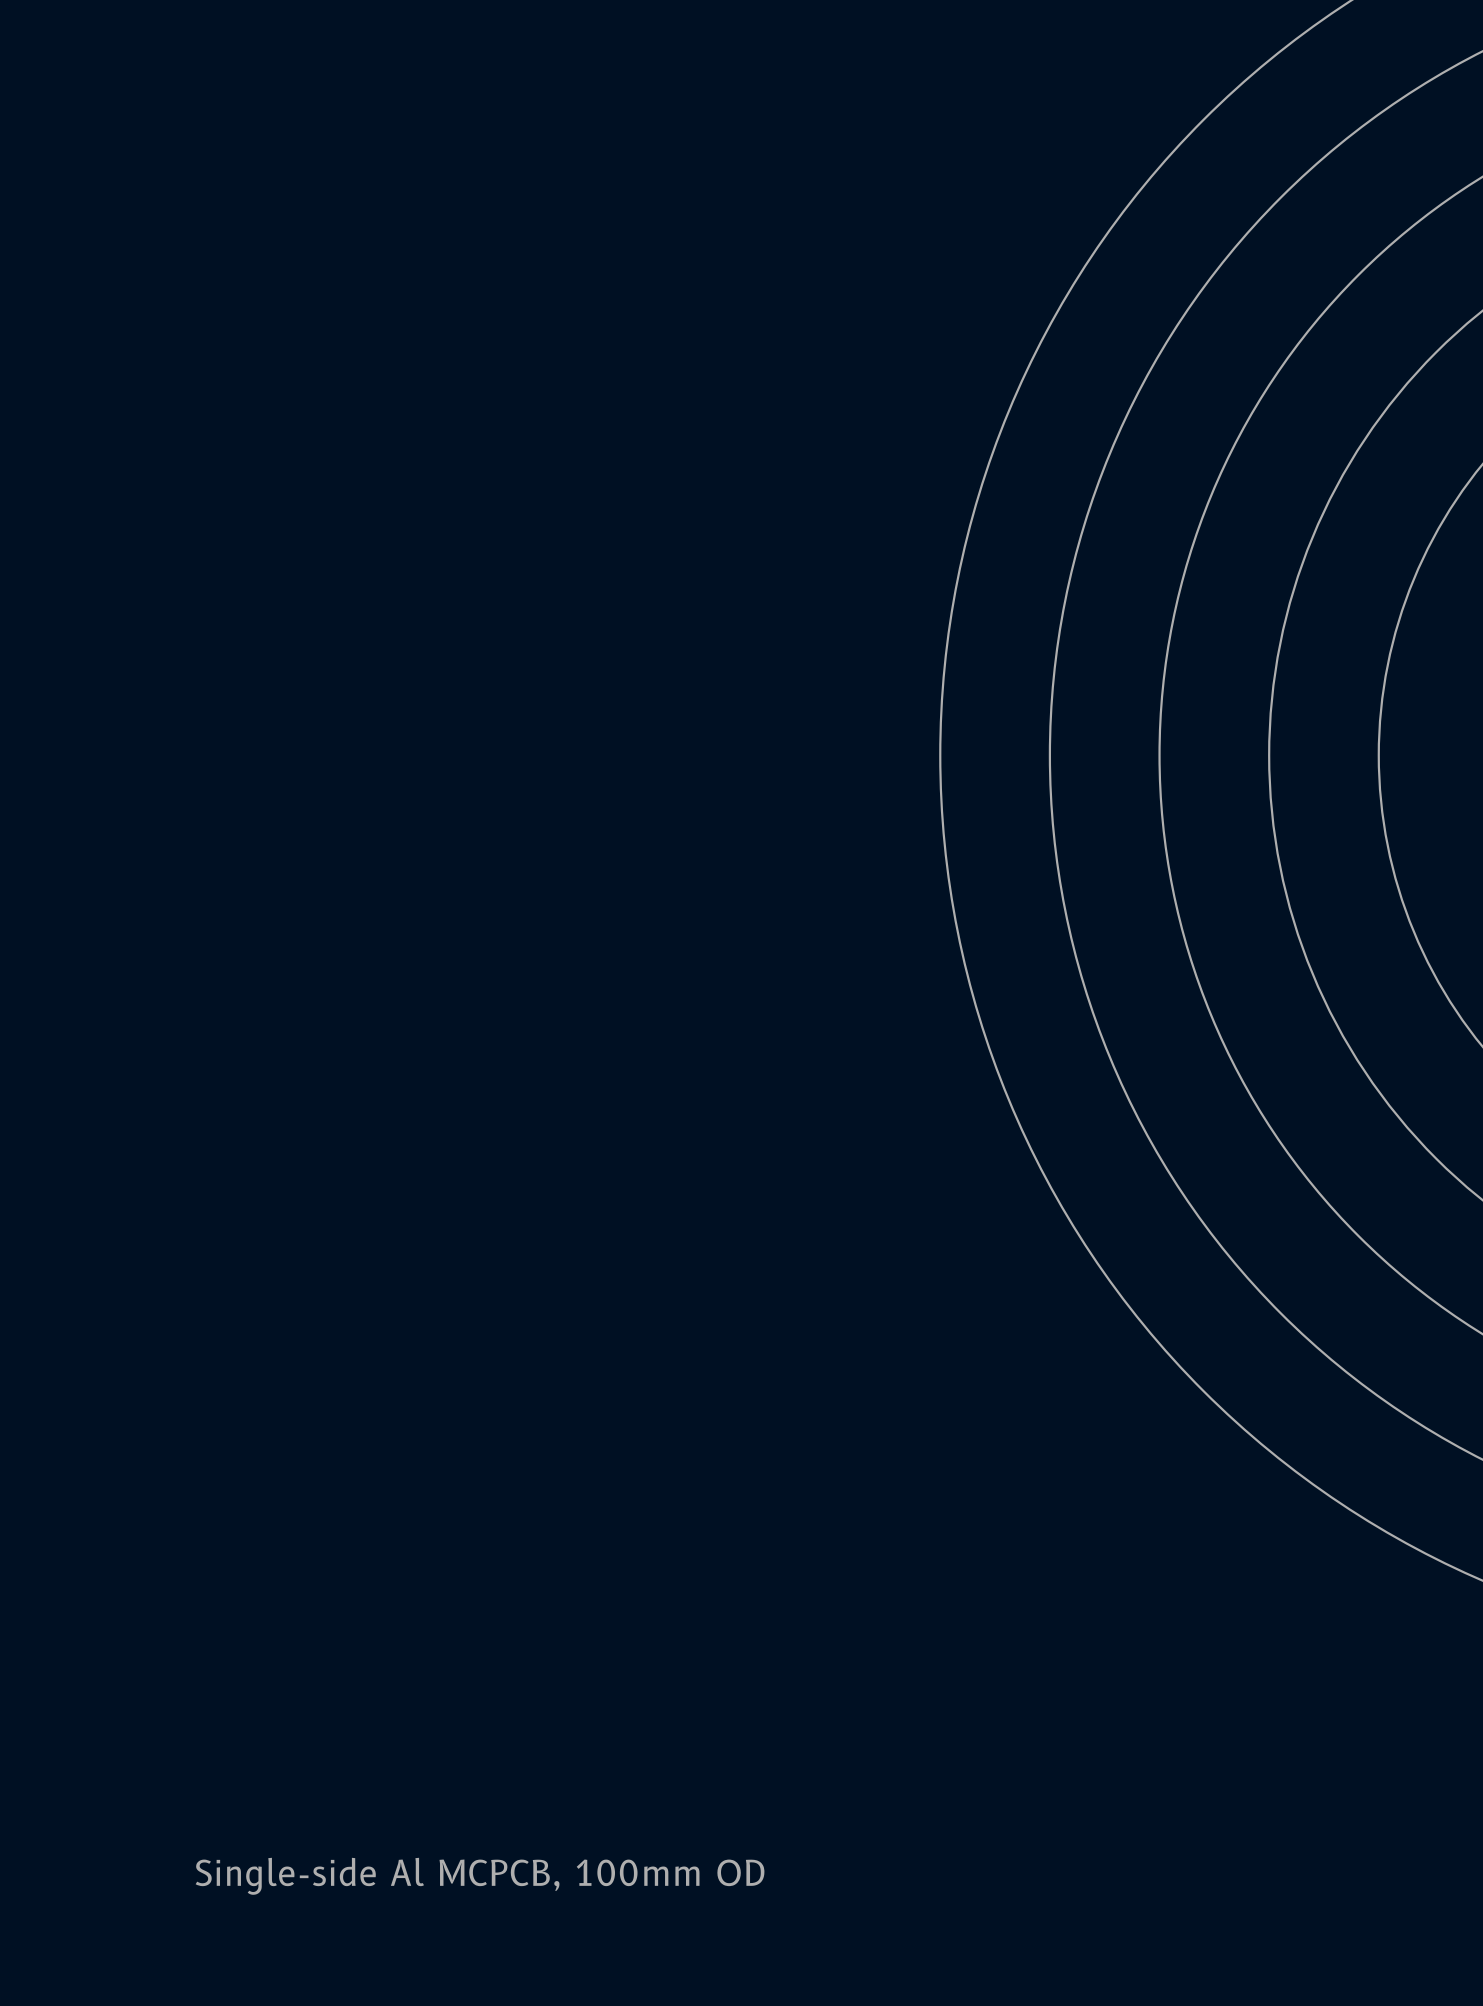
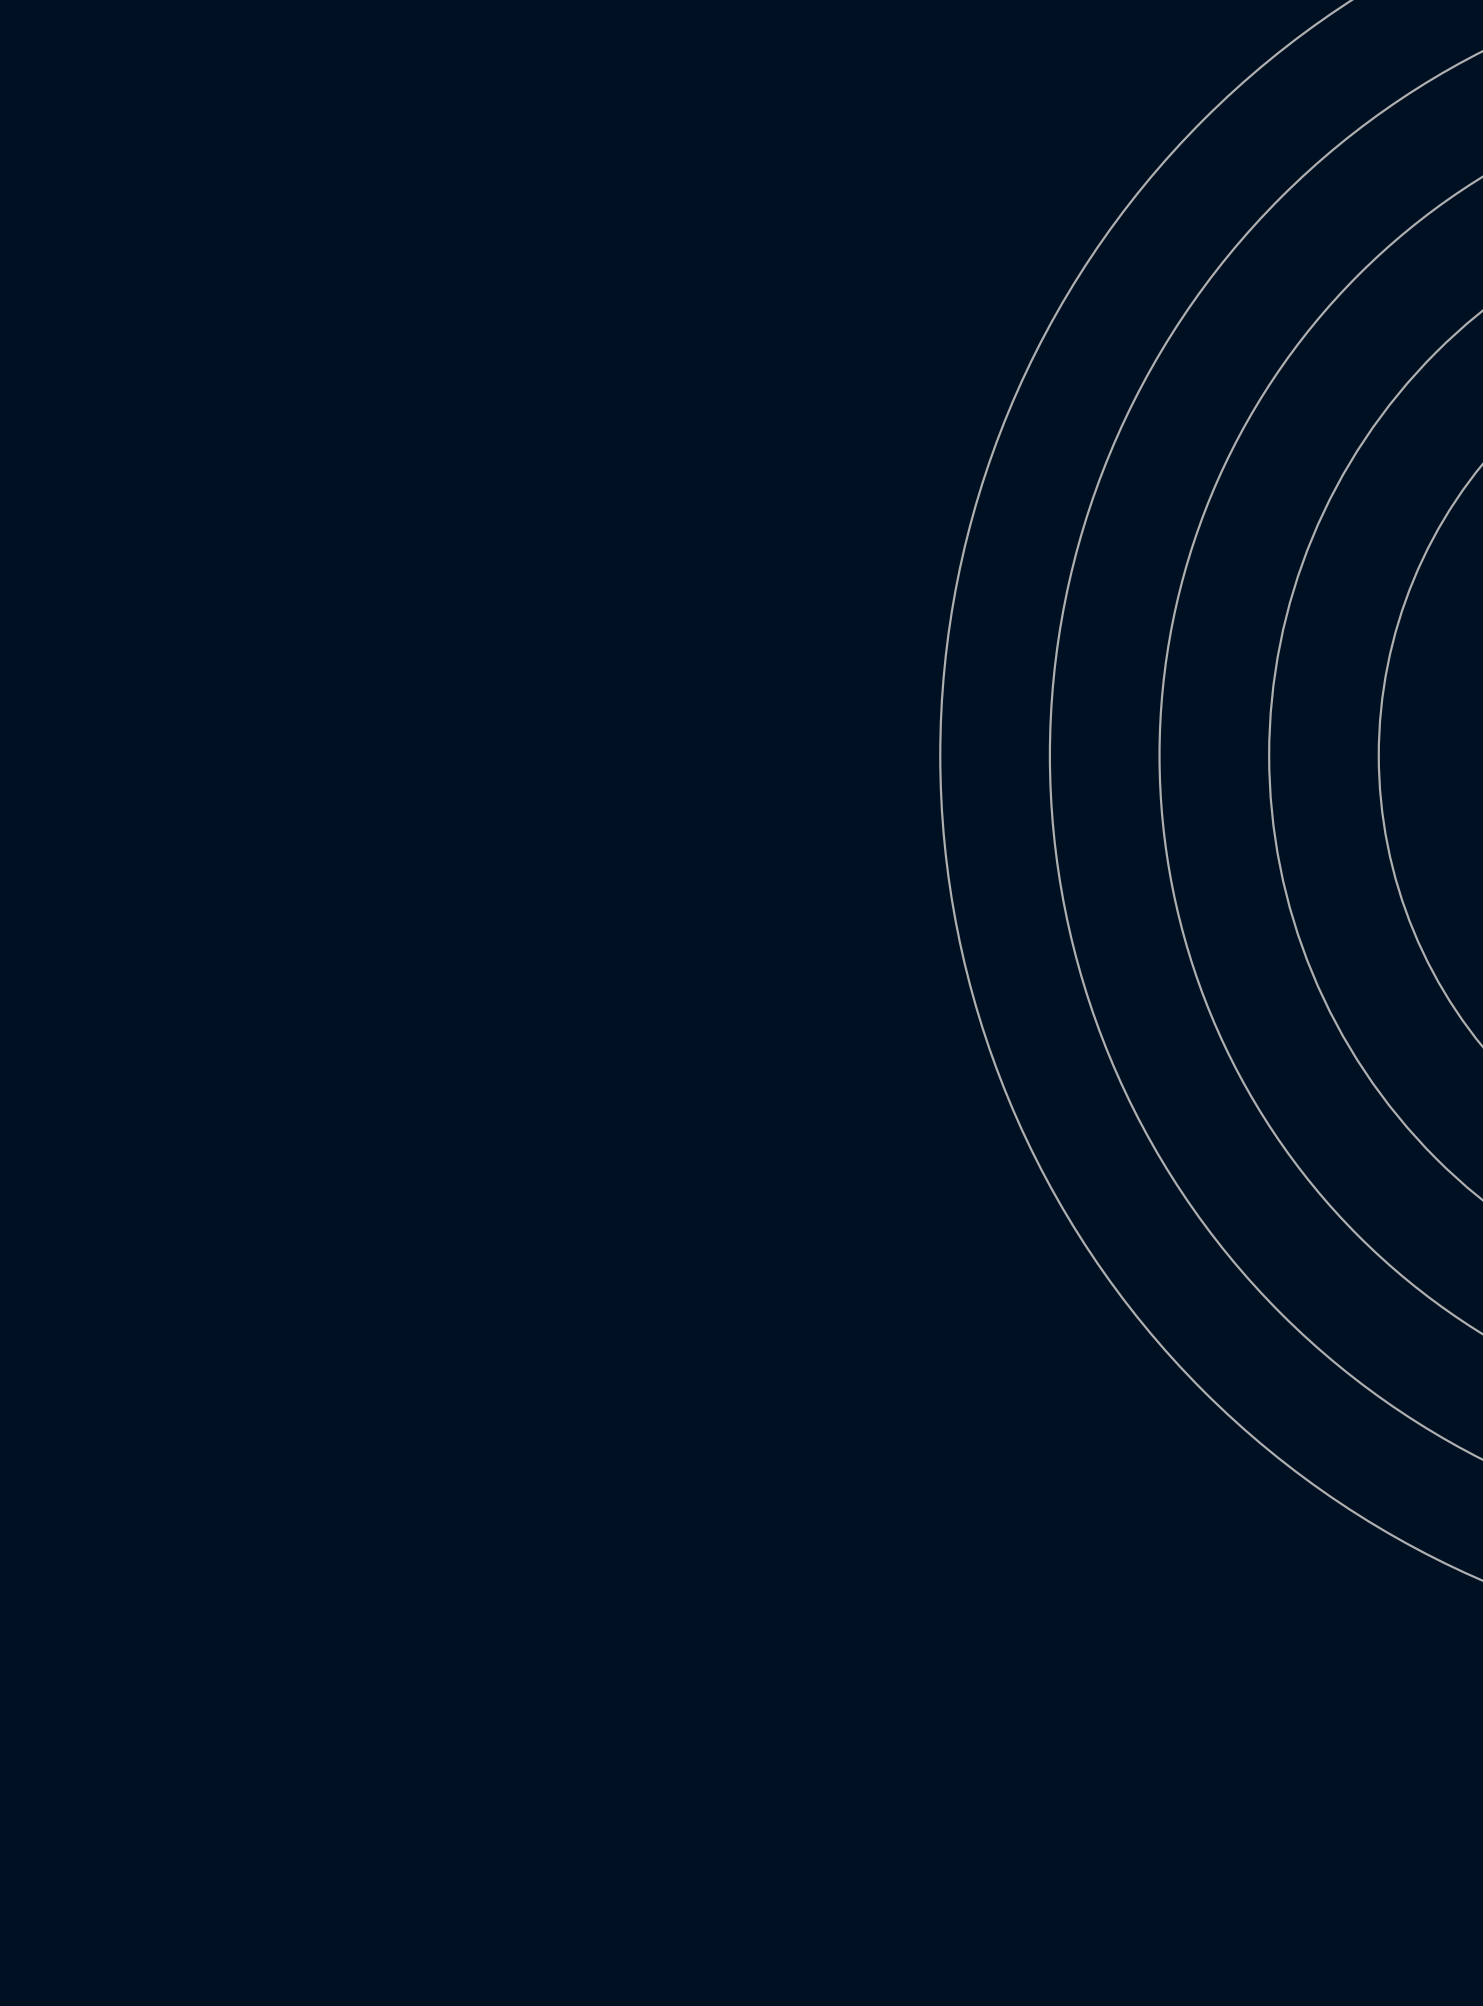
text: Single-side Al MCPCB, 100mm OD (480, 1876) -> none

